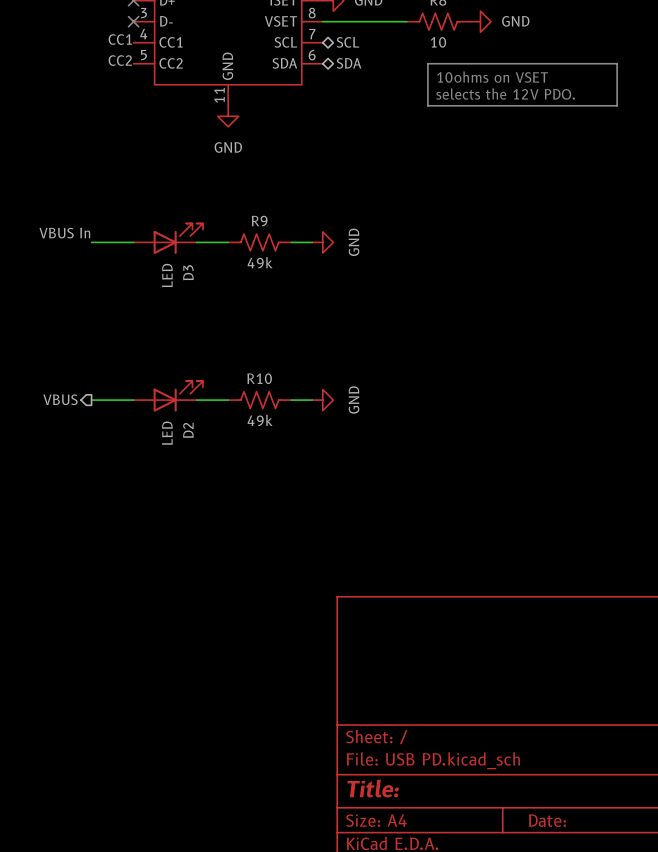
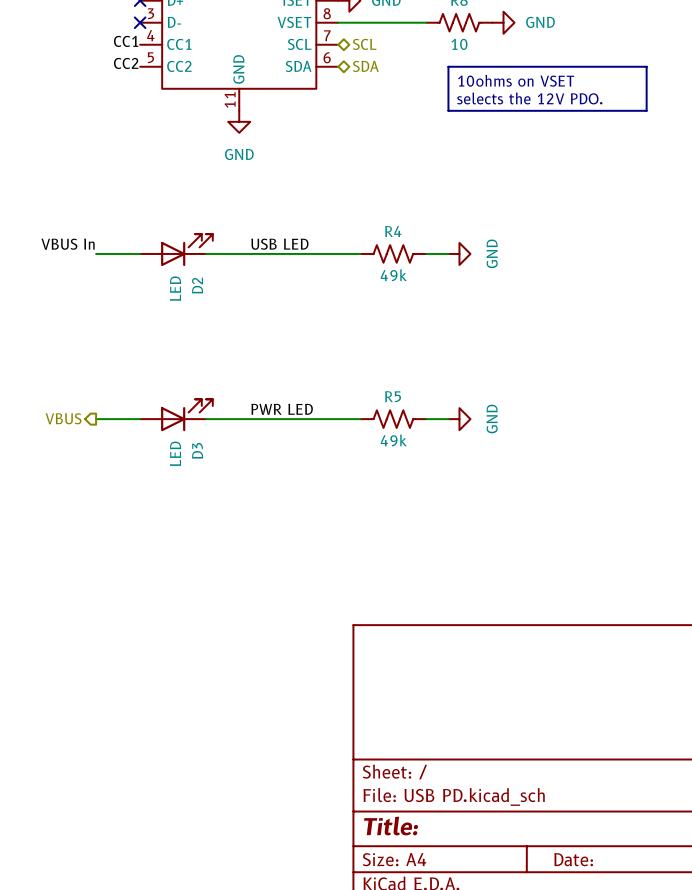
label: none -> USB LED (279, 244)
R9: 49k (259, 242) -> none
wire: none -> (327, 253) (360, 253)
power symbol: GND (322, 242) -> none
R4: none -> 49k (393, 253)
wire: none -> (426, 253) (448, 253)
power symbol: none -> GND (459, 253)
D3 name: D3 (188, 272) -> D2 (197, 285)
label: none -> PWR LED (282, 409)
R10: 49k (259, 400) -> none
wire: none -> (327, 419) (360, 419)
power symbol: GND (322, 400) -> none
R5: none -> 49k (393, 419)
wire: none -> (426, 419) (448, 419)
power symbol: none -> GND (459, 419)
D2 name: D2 (188, 430) -> D3 (197, 450)

